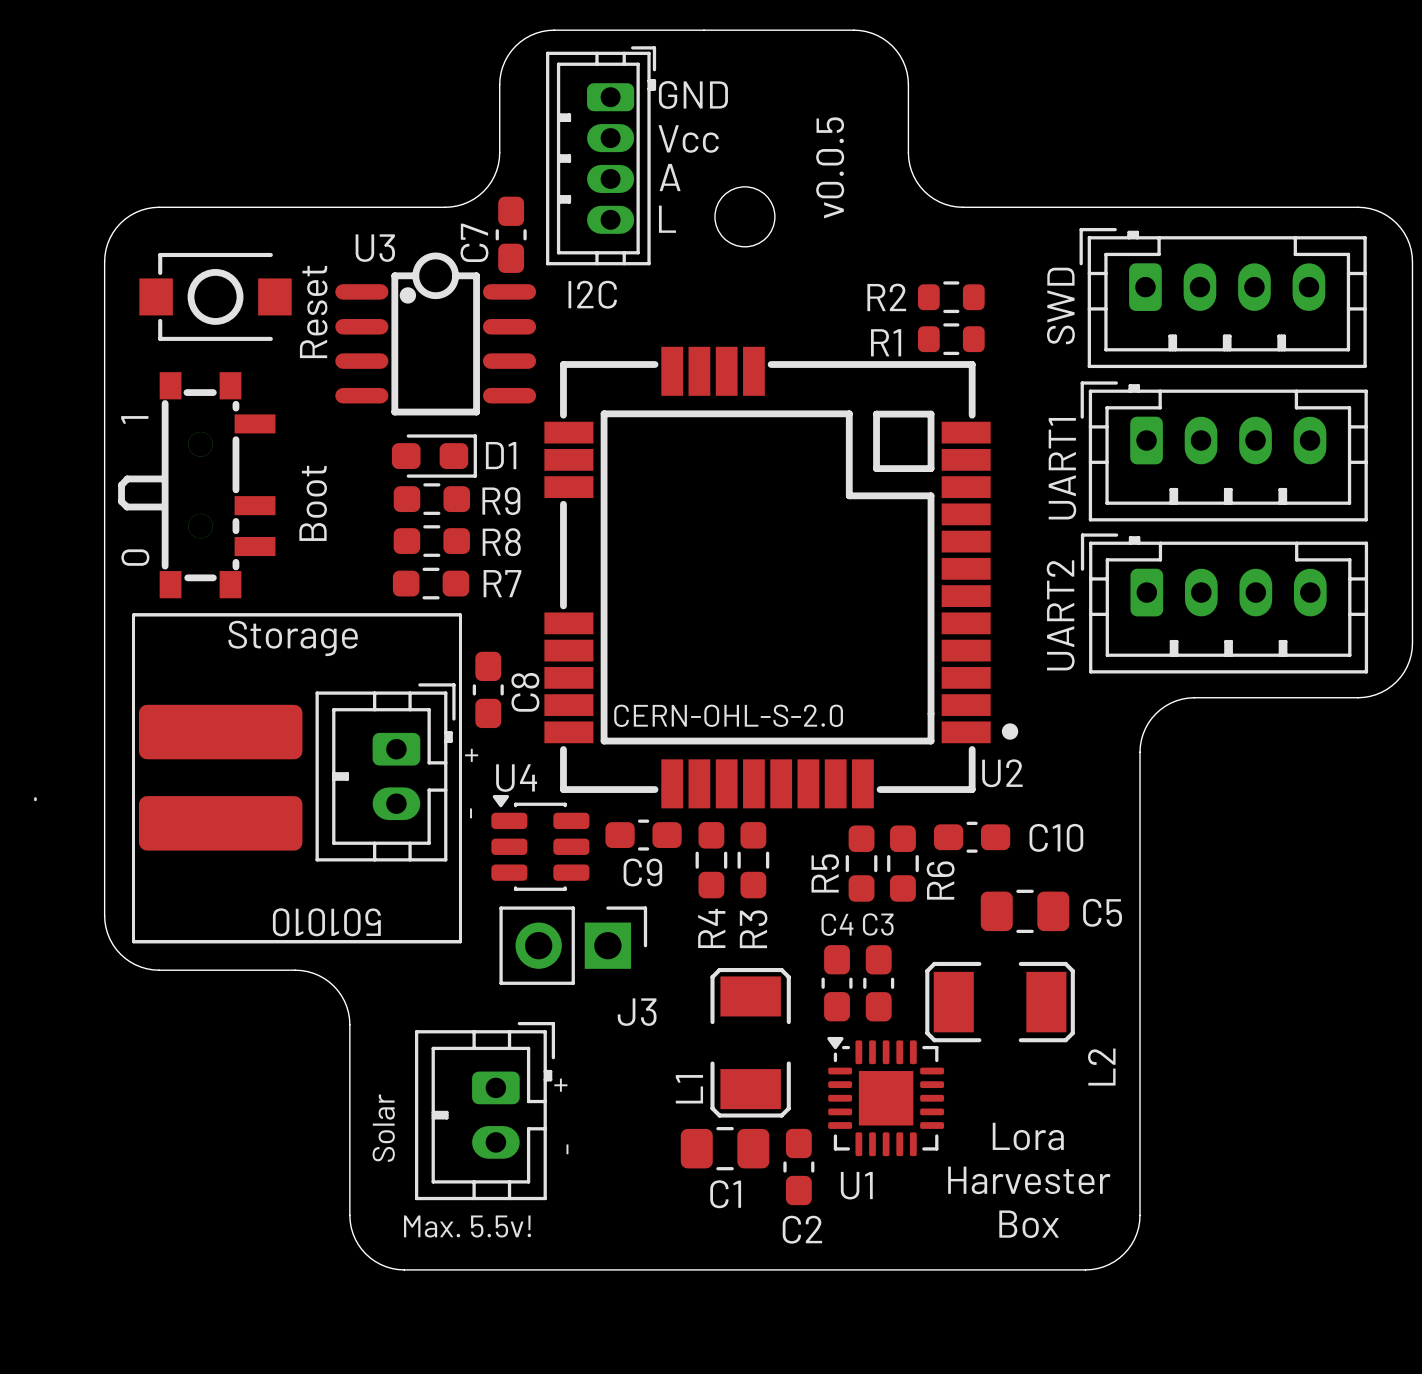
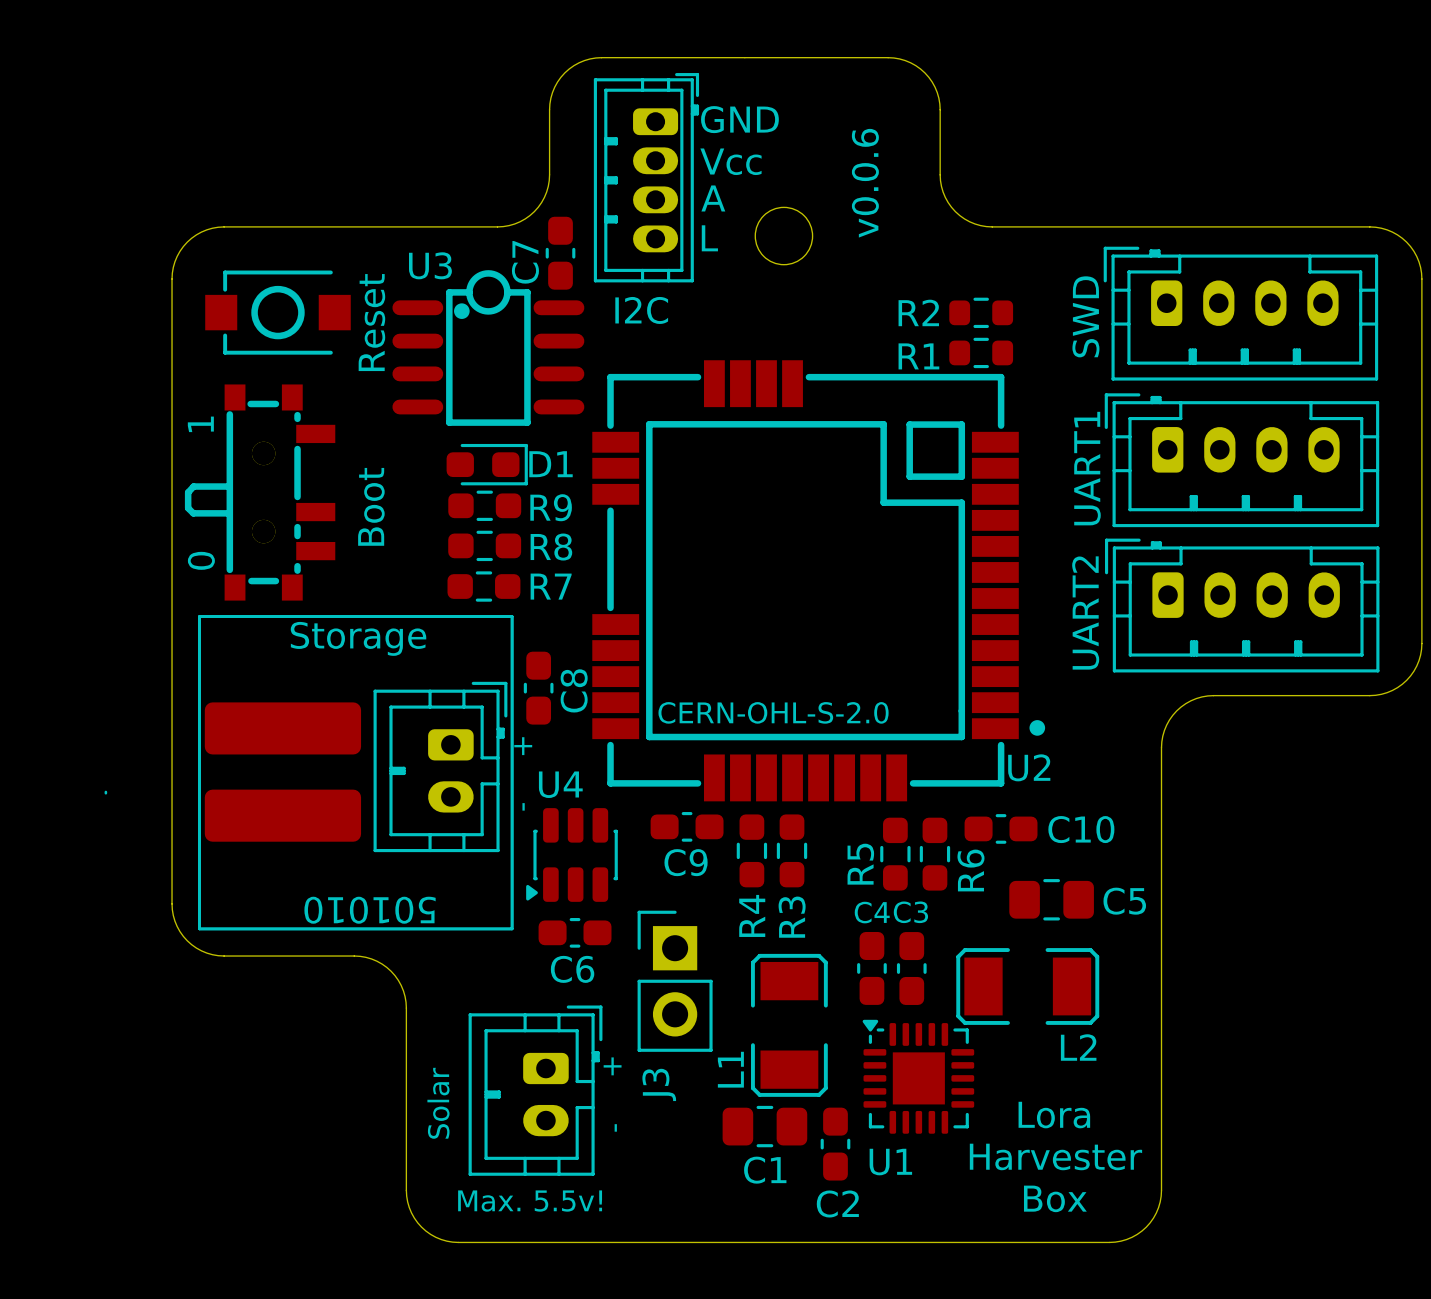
text: v0.0.5 (830, 167) -> v0.0.6 (865, 183)
U4 rotation: 0° (540, 842) -> 90° counterclockwise (571, 854)
C6: none -> (575, 932)
J3 rotation: 0° (573, 945) -> 90° counterclockwise (675, 981)
J3 name position: J3 (637, 1012) -> J3 (659, 1084)
L2 name rotation: 0° (1101, 1067) -> 90° clockwise (1078, 1047)

